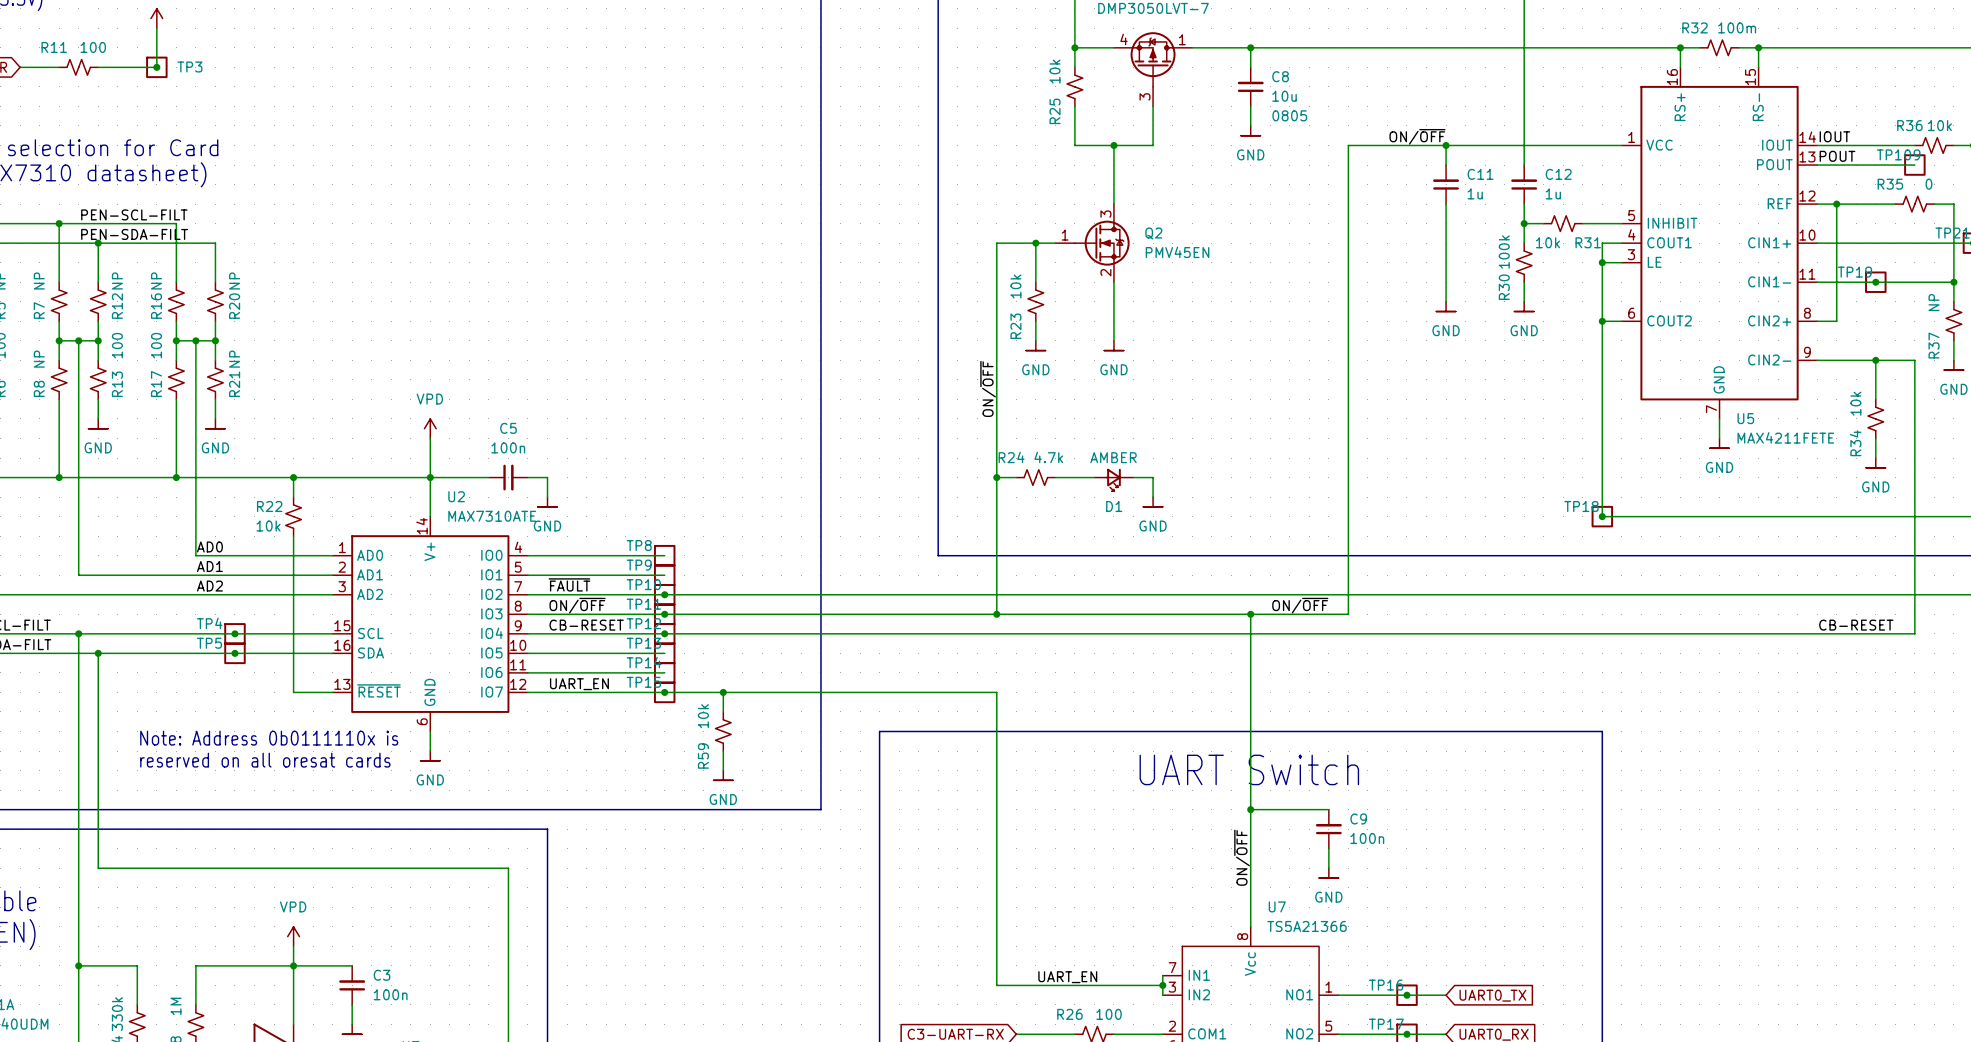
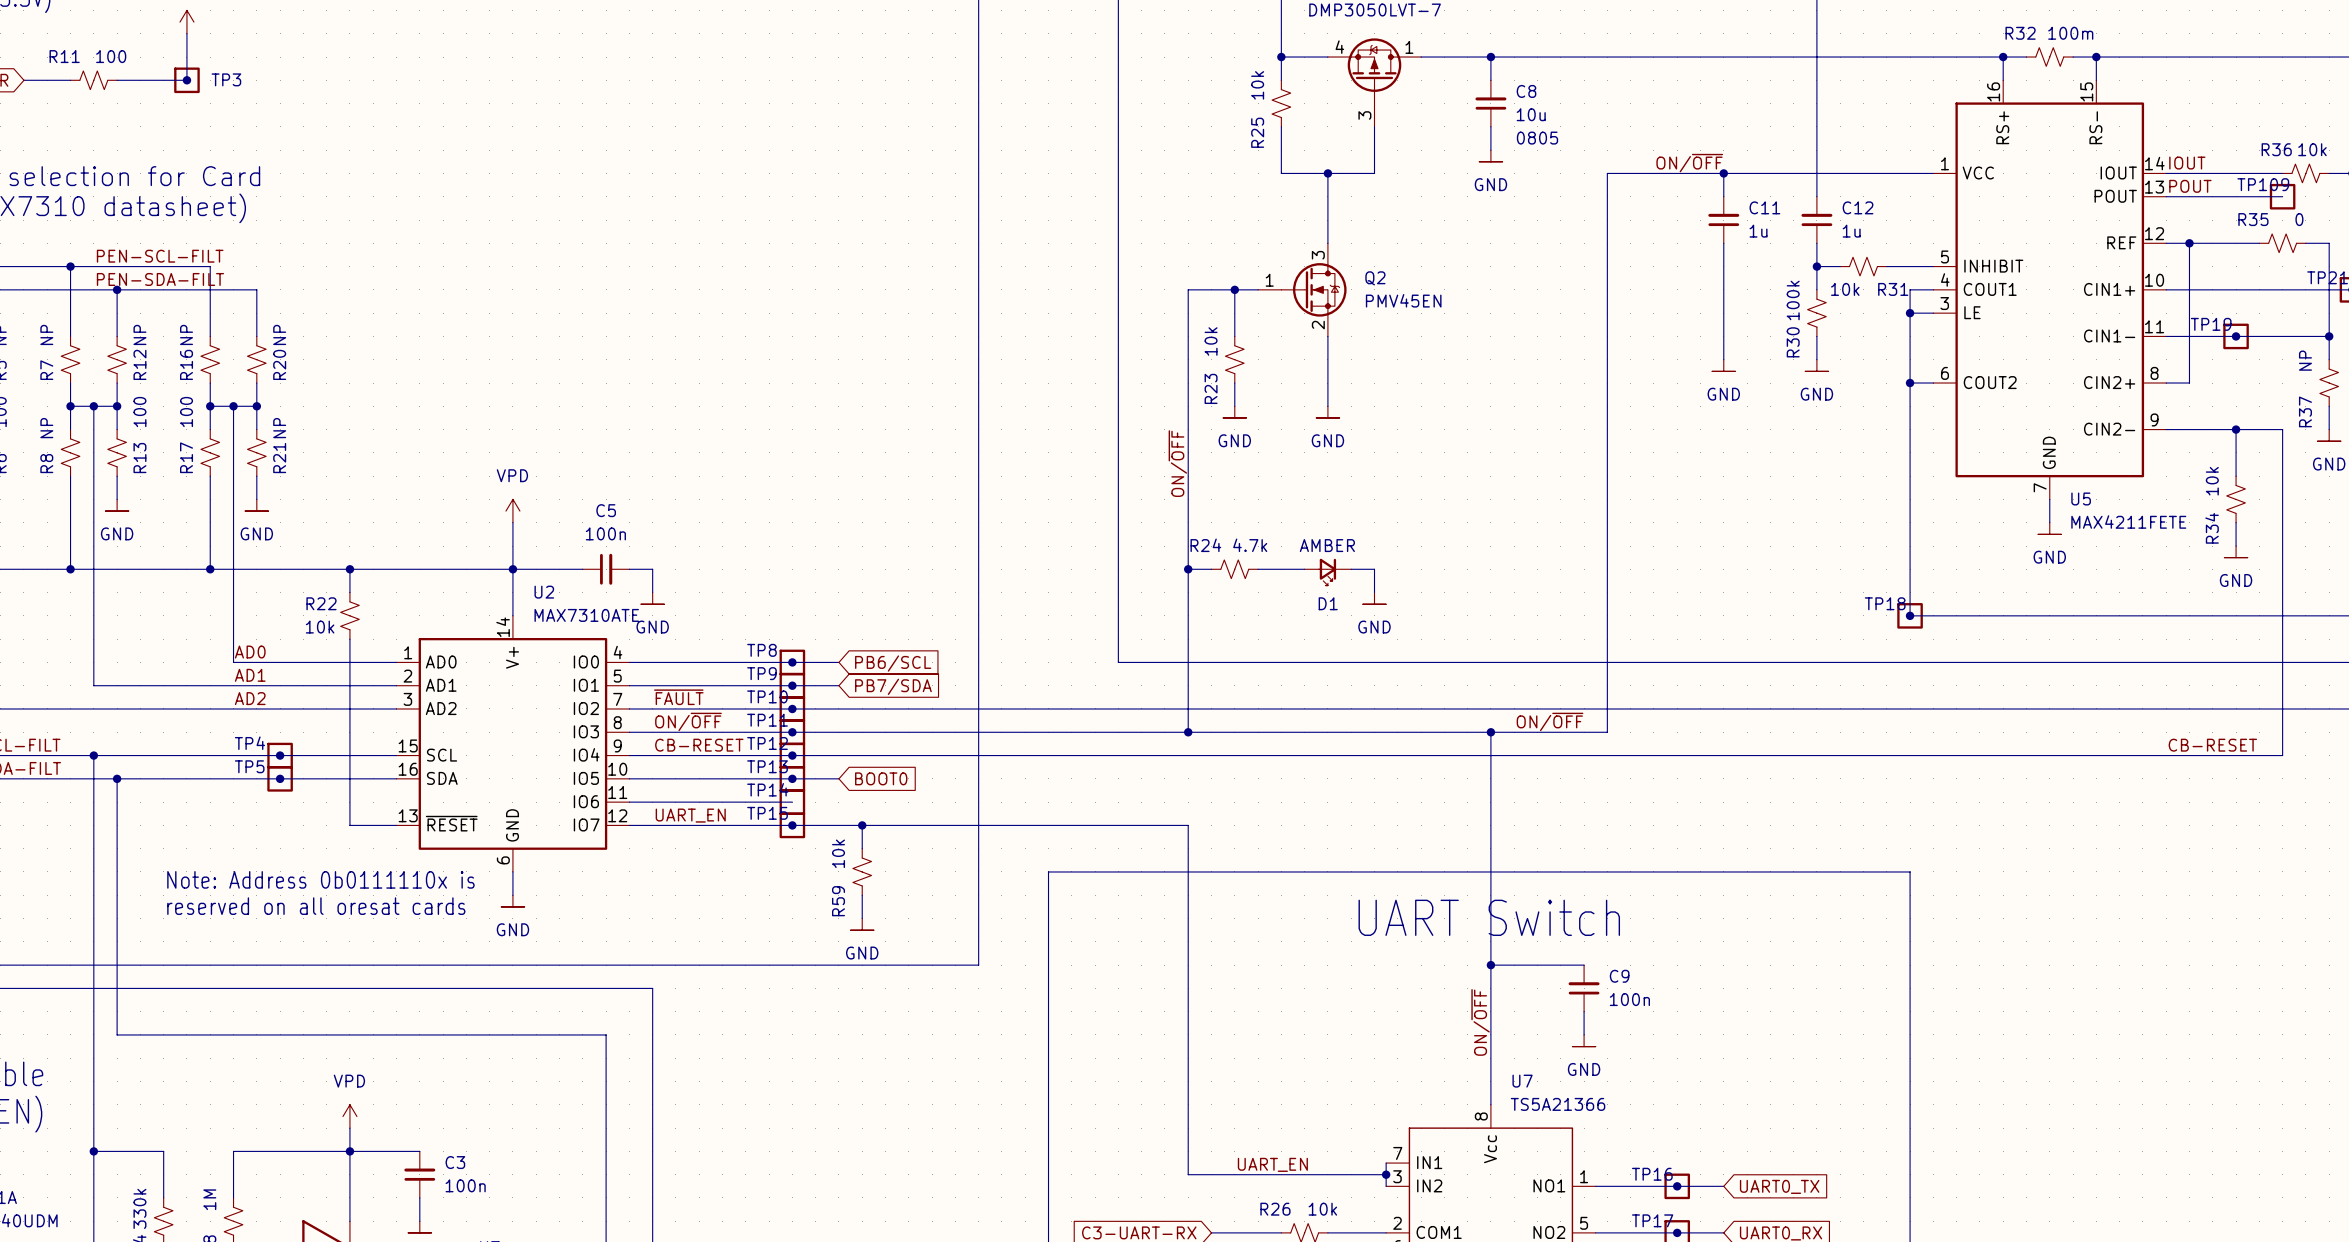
wire: none -> (792, 662) (838, 662)
junction: none -> (792, 662)
global label: none -> PB6/SCL (893, 663)
wire: none -> (792, 685) (838, 685)
junction: none -> (792, 685)
global label: none -> PB7/SDA (893, 686)
wire: none -> (792, 778) (838, 778)
junction: none -> (792, 778)
global label: none -> BOOT0 (881, 778)
R26 value: 100 (1109, 1014) -> 10k (1322, 1209)

